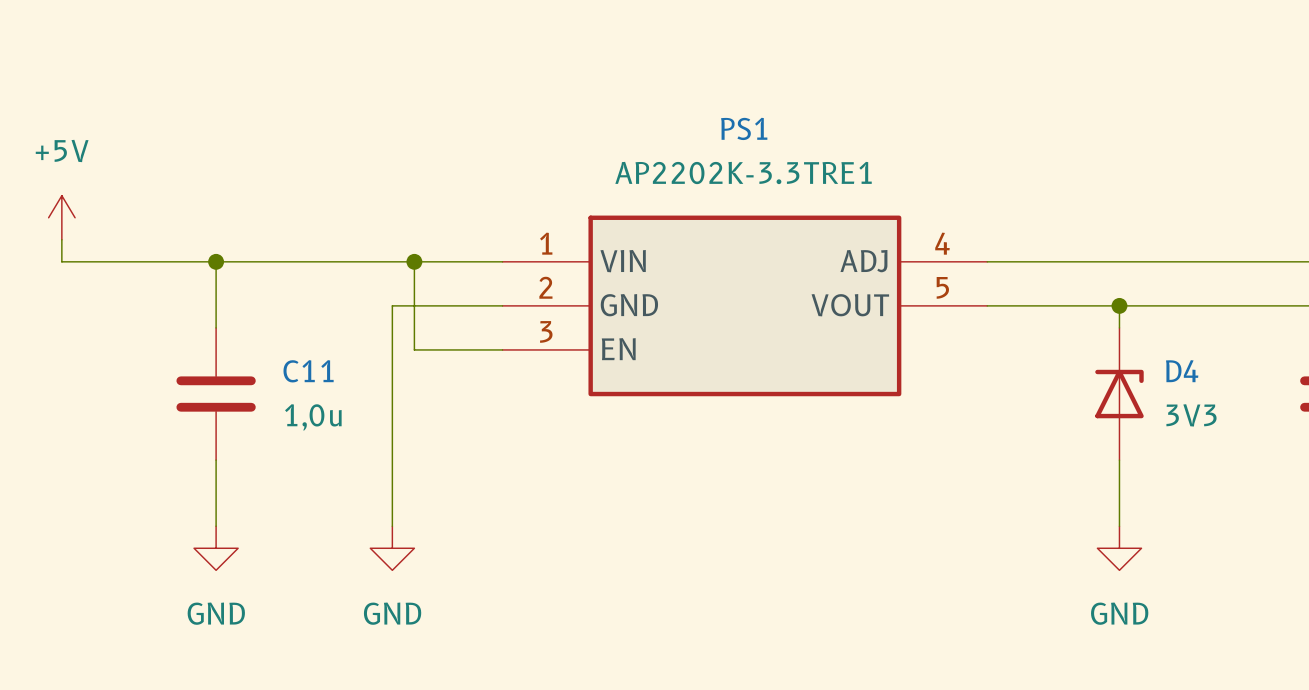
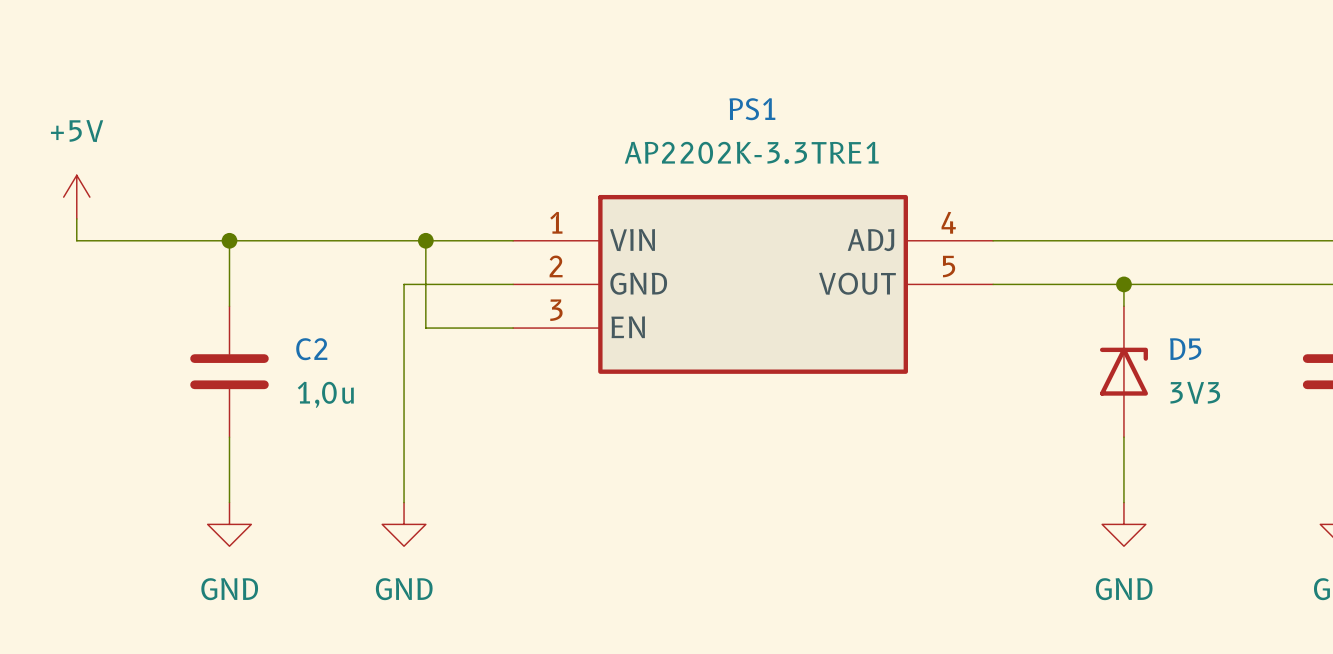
C11 name: C11 (308, 371) -> C2 (311, 349)
D4 name: D4 (1182, 371) -> D5 (1185, 349)

